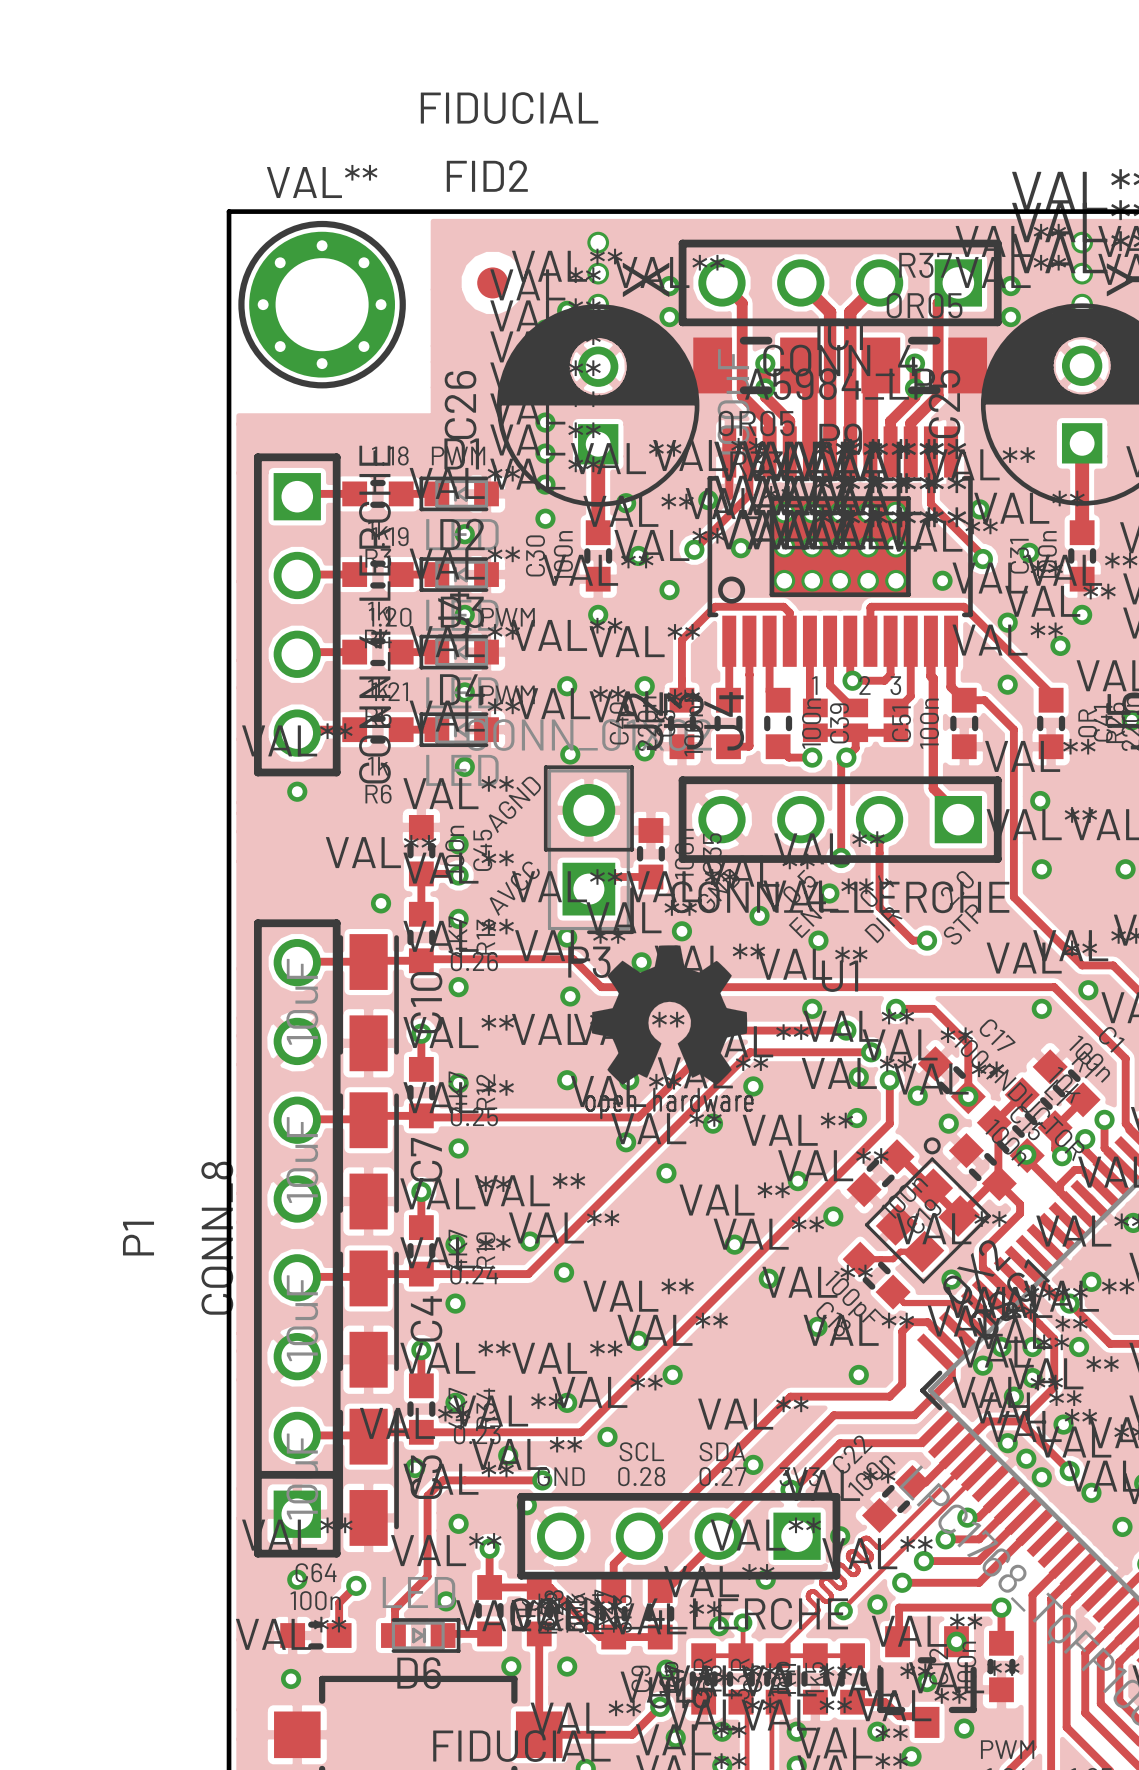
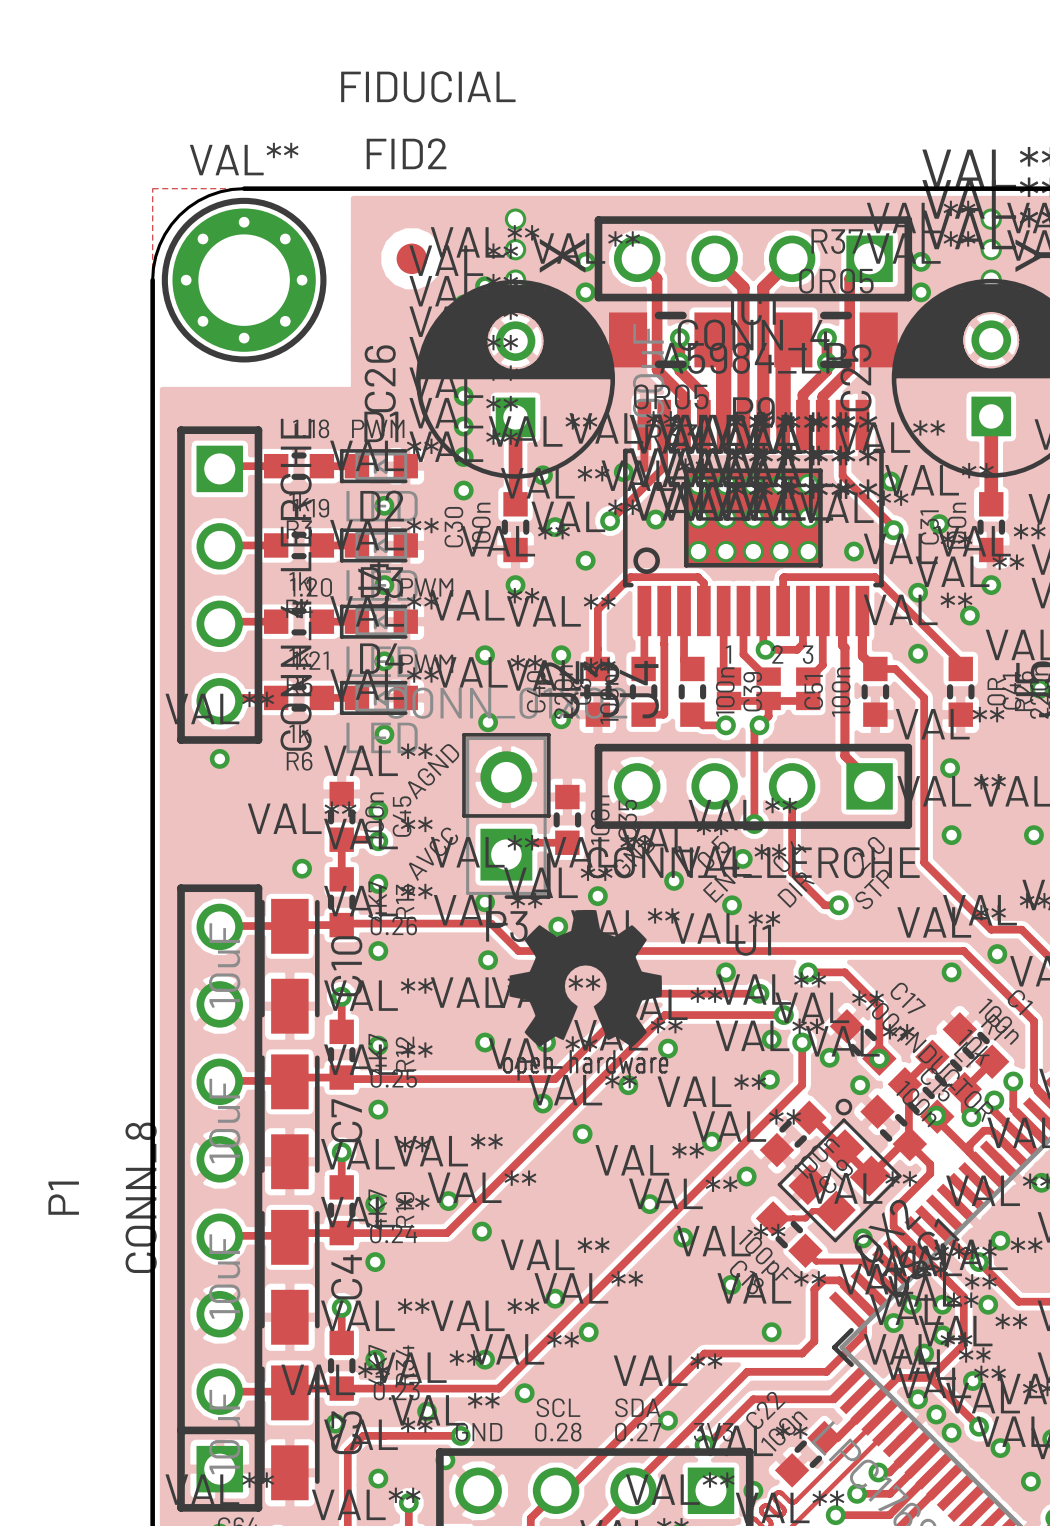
board edge: (322, 211) (229, 211) (229, 304) -> (244, 188) (232, 189) (209, 195) (188, 207) (179, 215) (171, 224) (159, 245) (153, 268) (152, 280)

